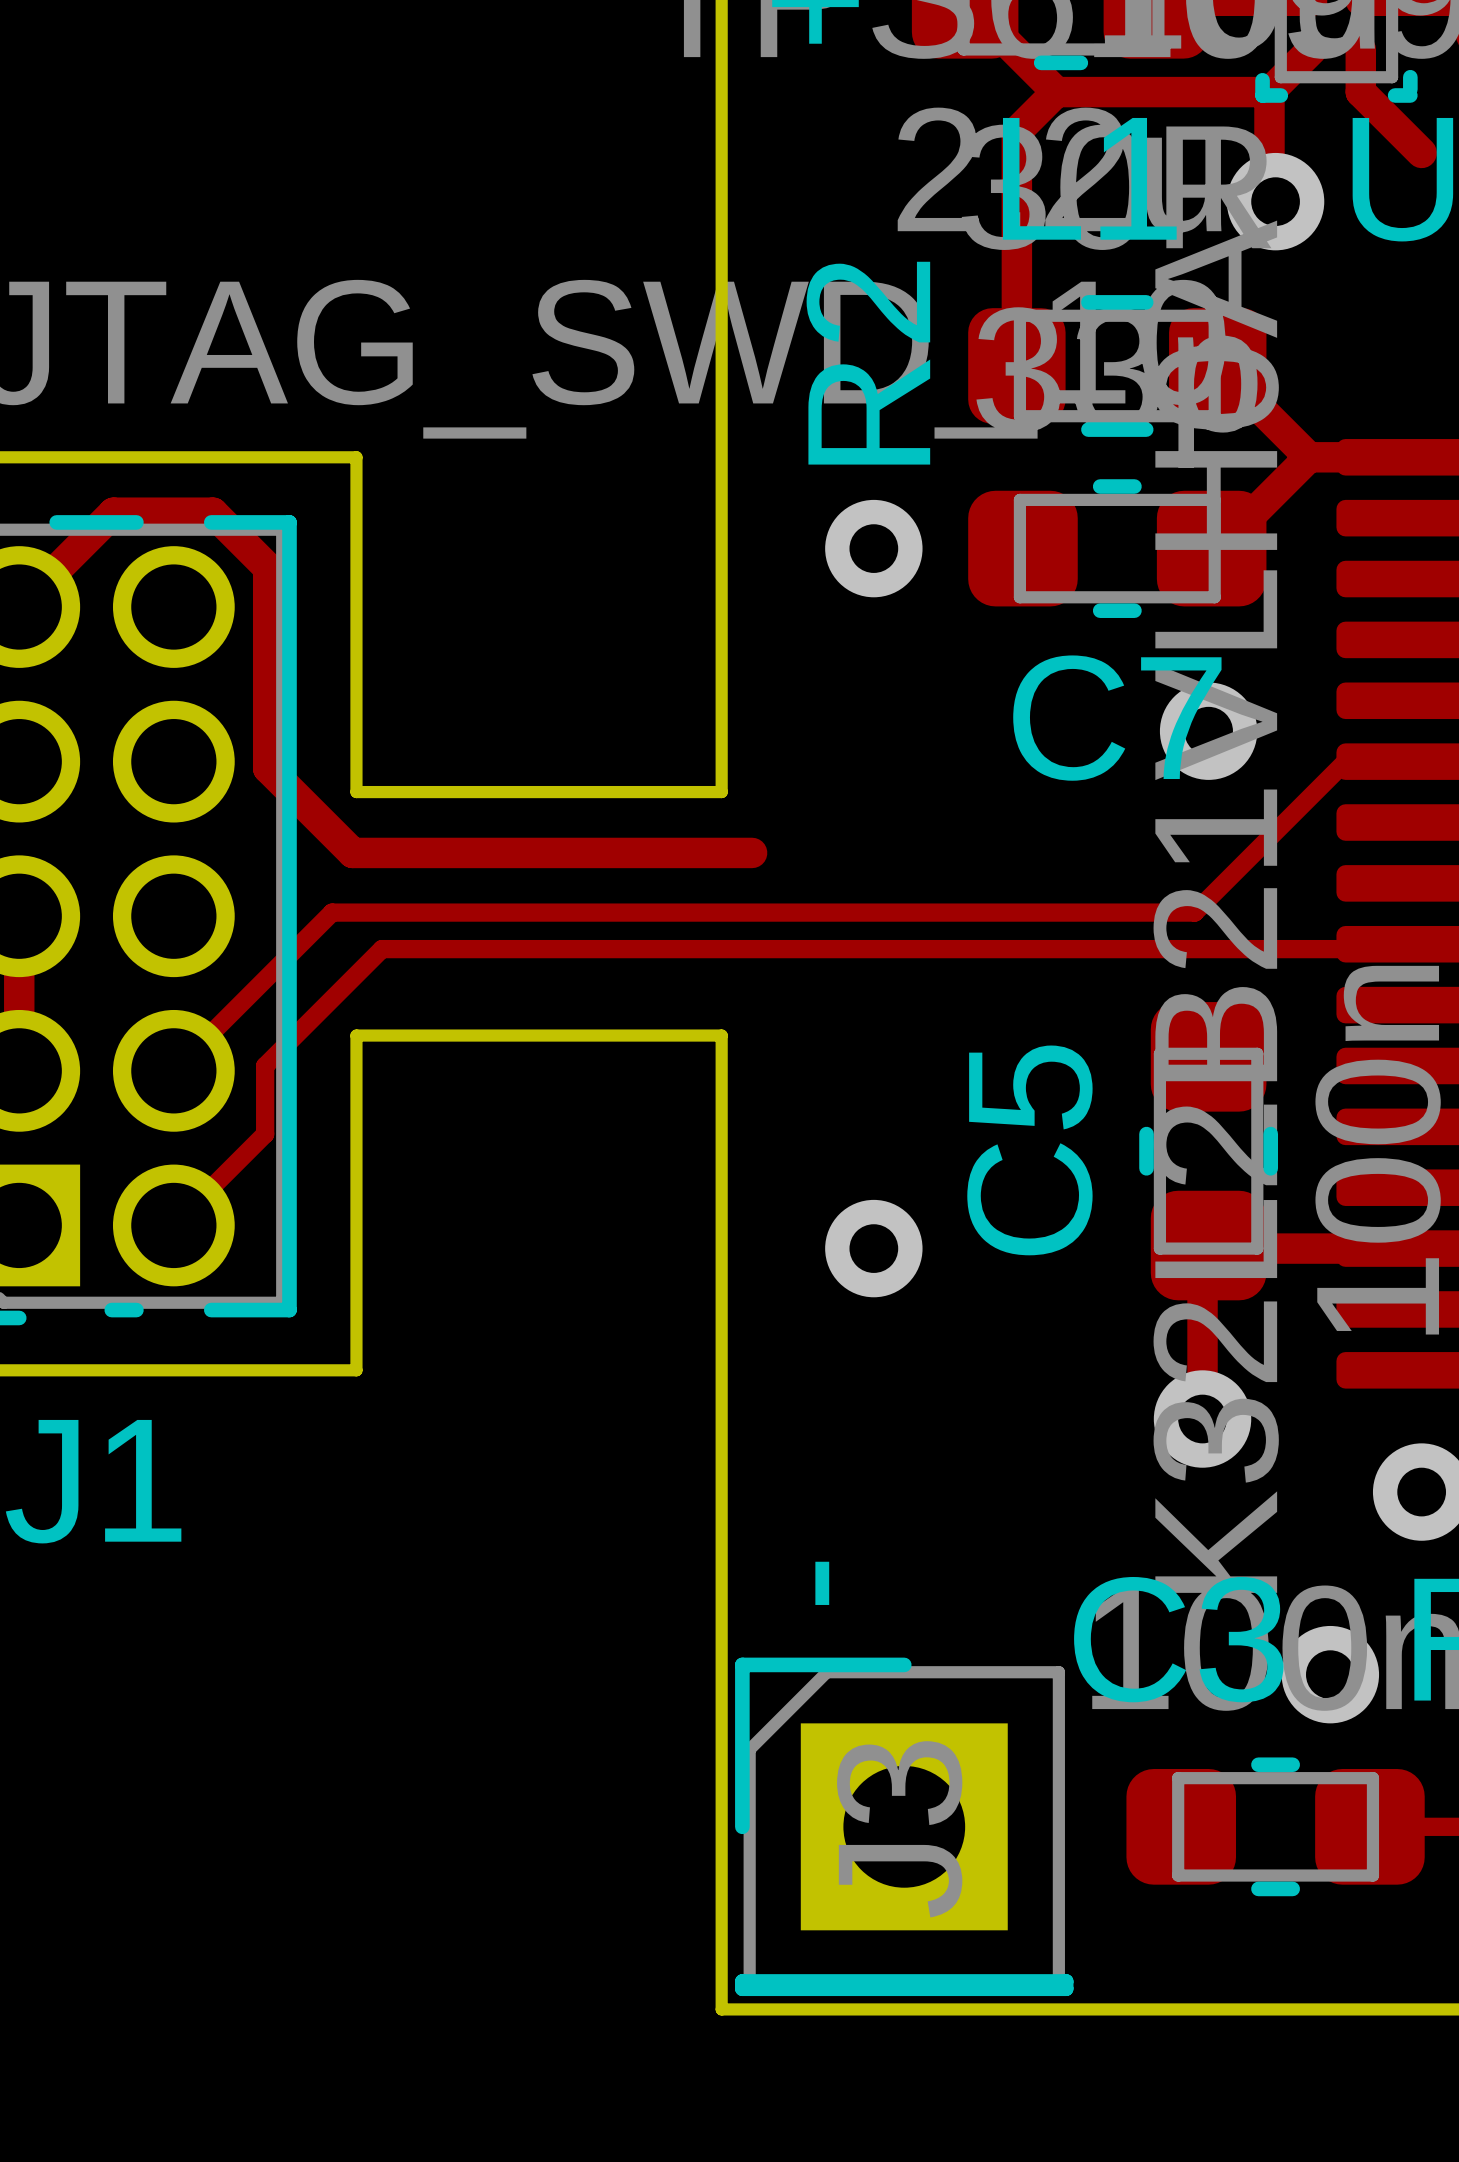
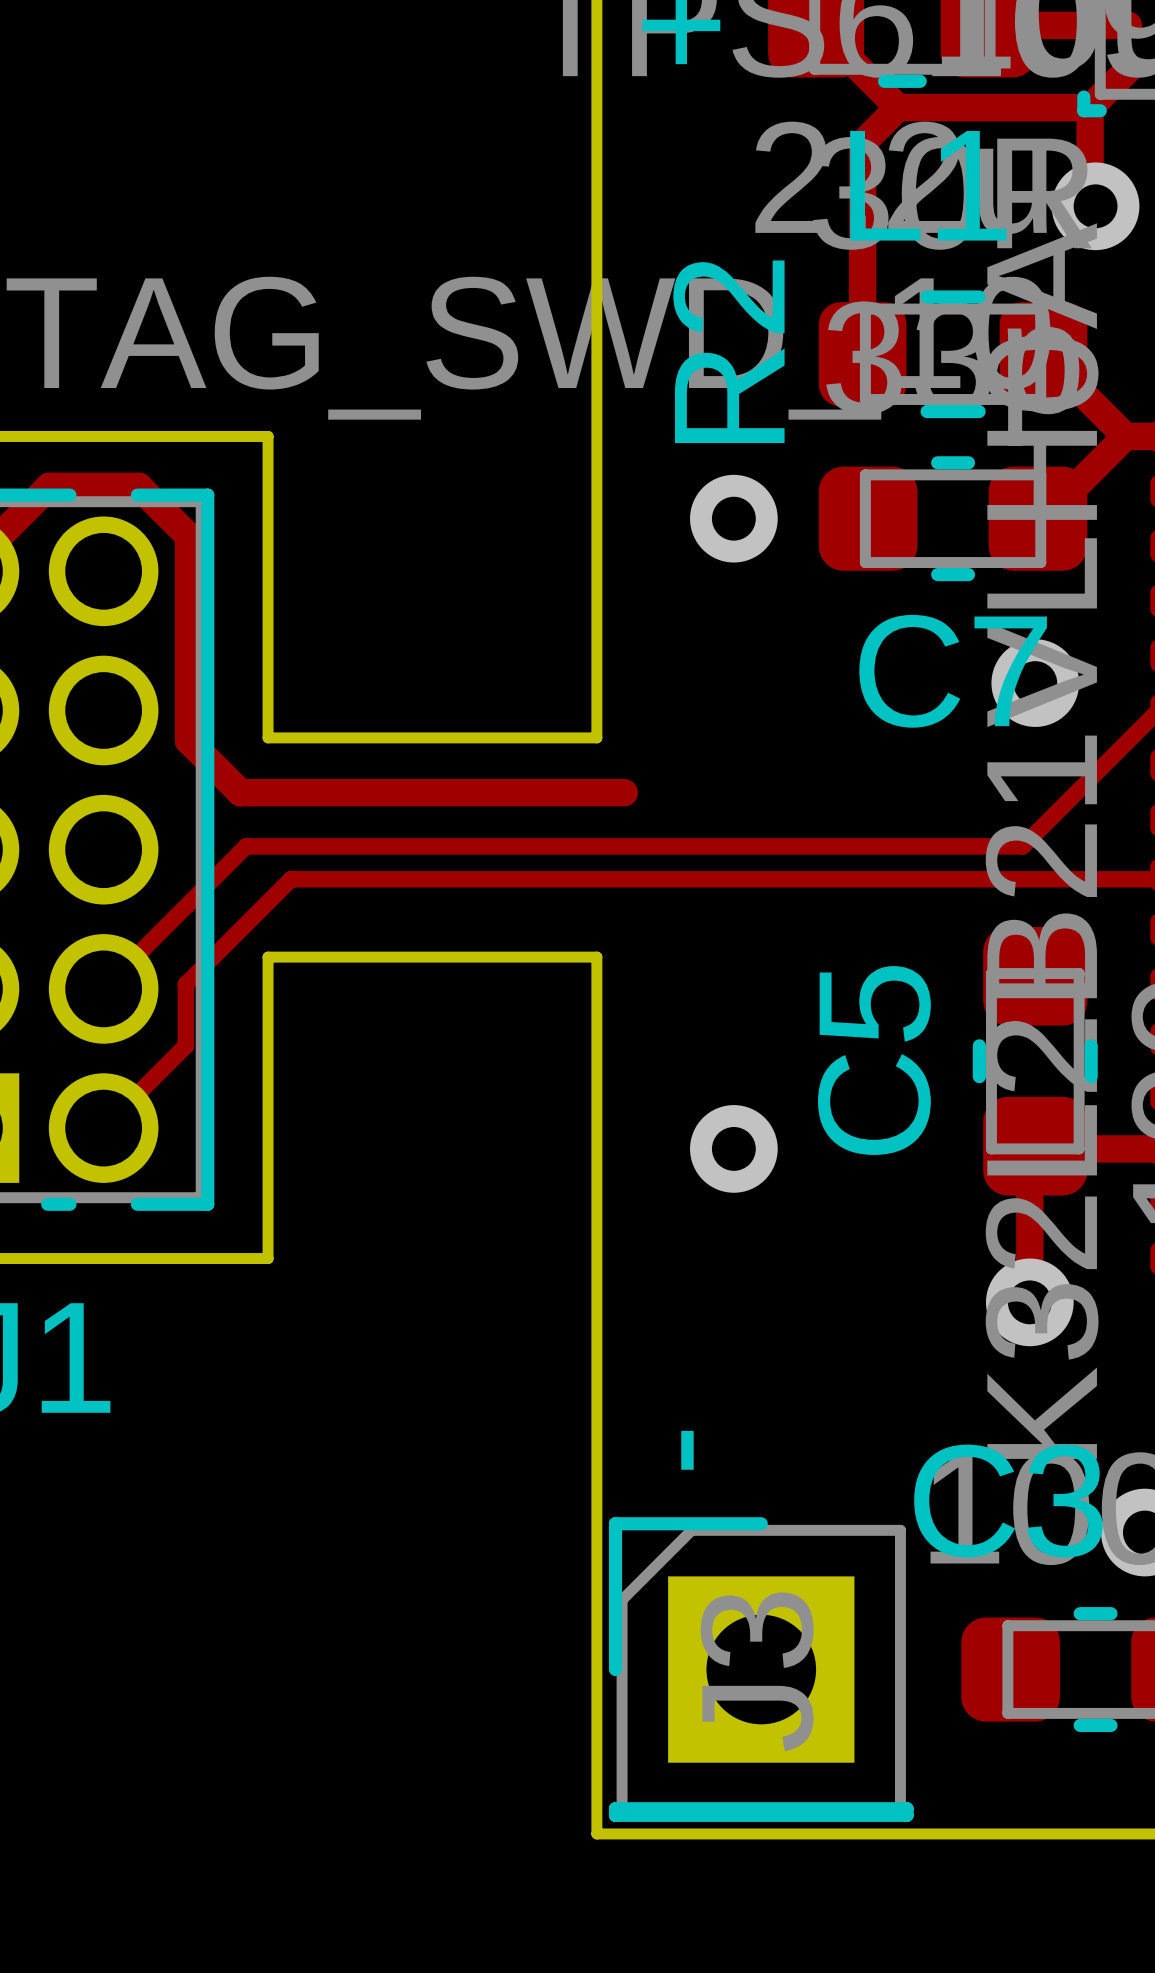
track: (268, 768) (352, 852) -> (188, 716) (188, 740) (240, 792) (264, 792)

